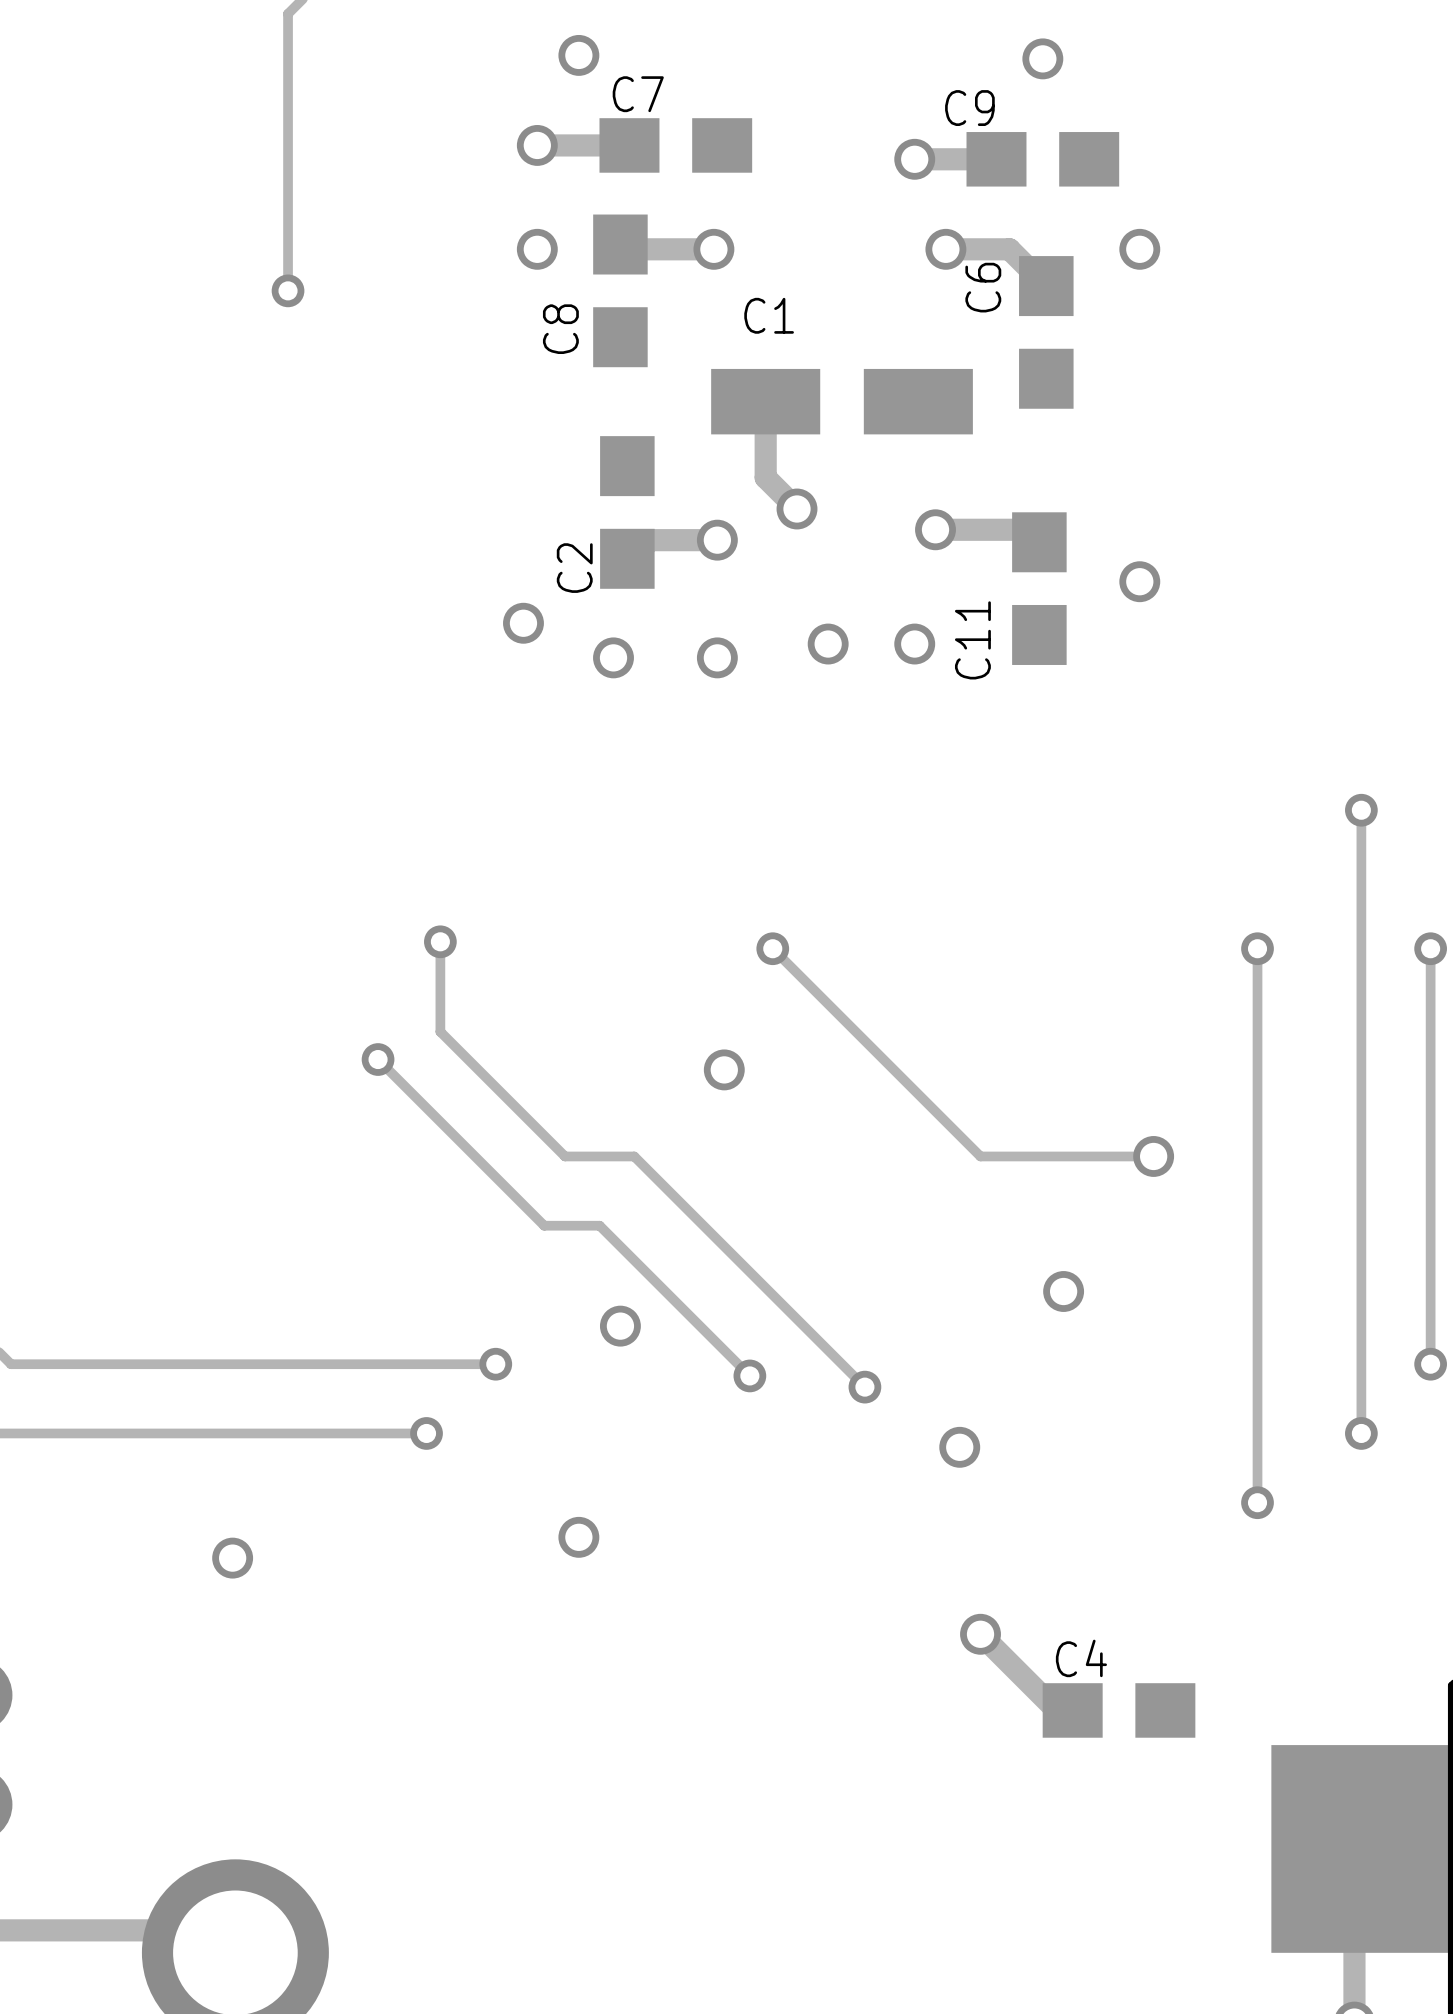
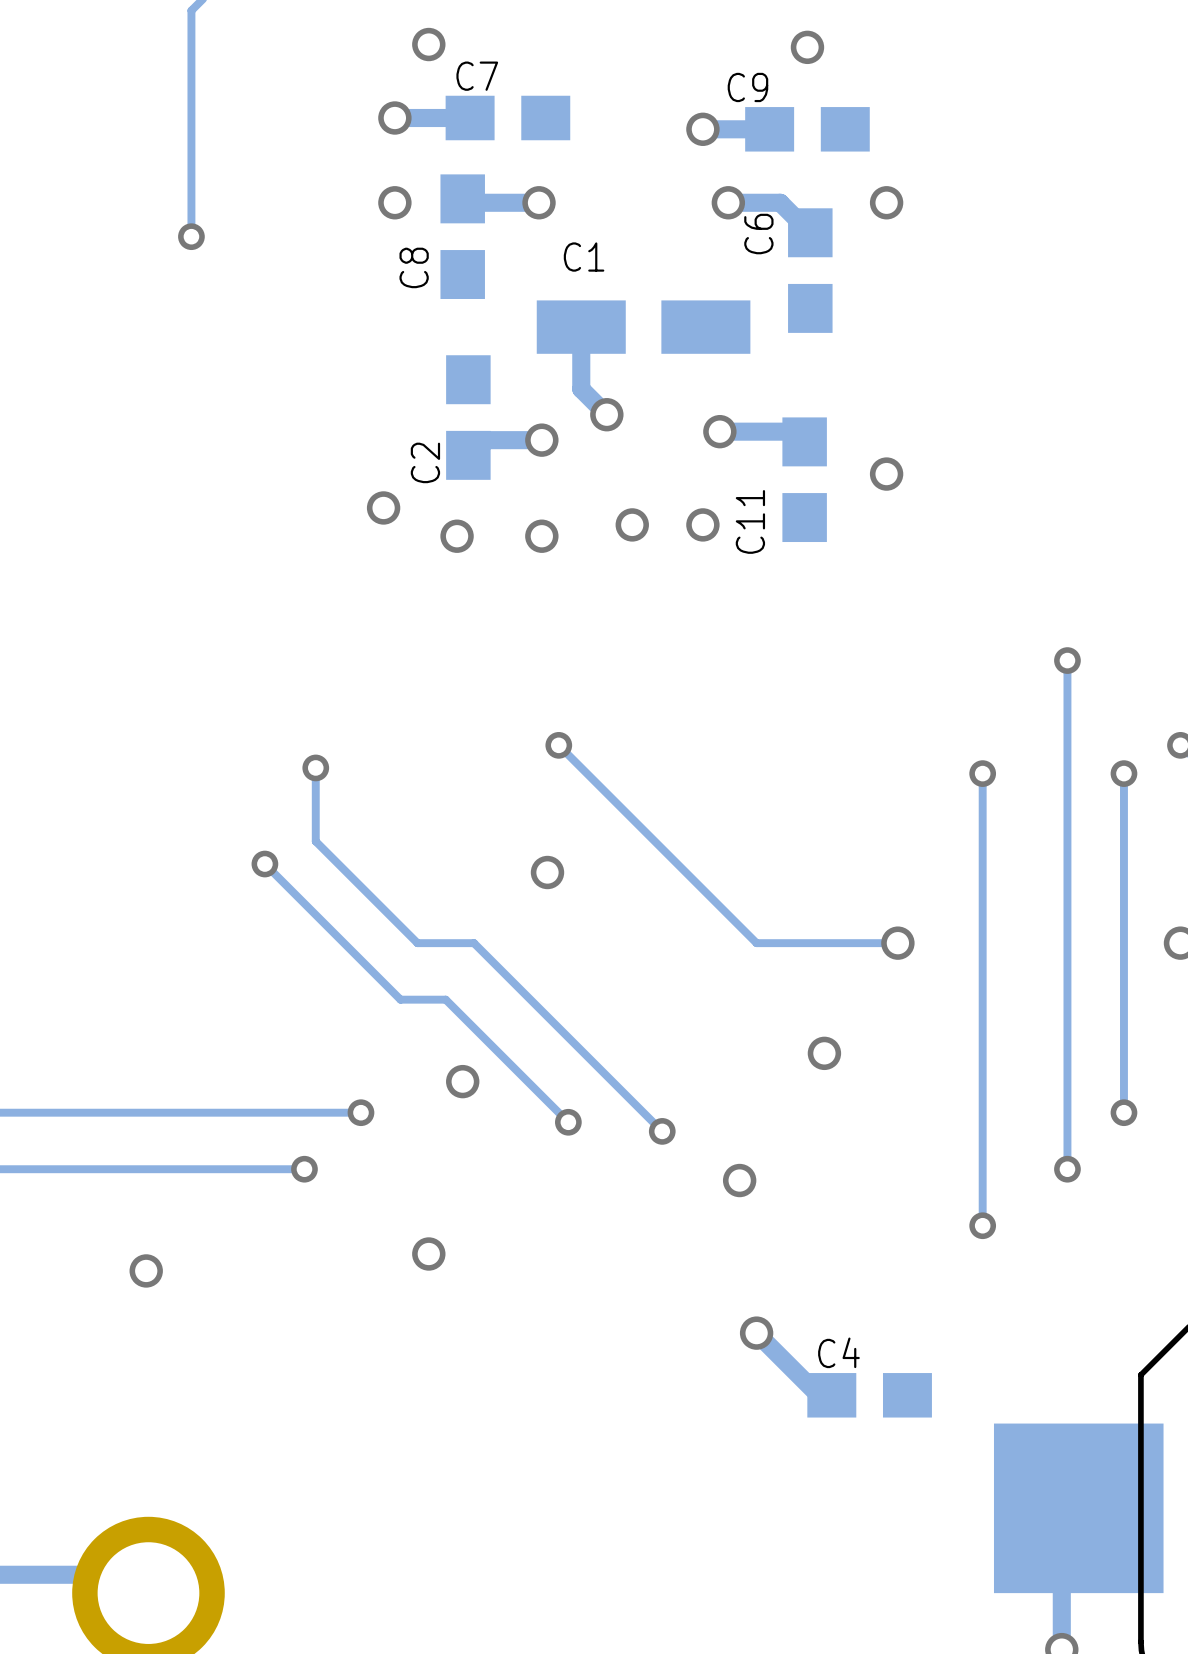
track: none -> (558, 745) (587, 773)
via position: (772, 948) -> (558, 745)

